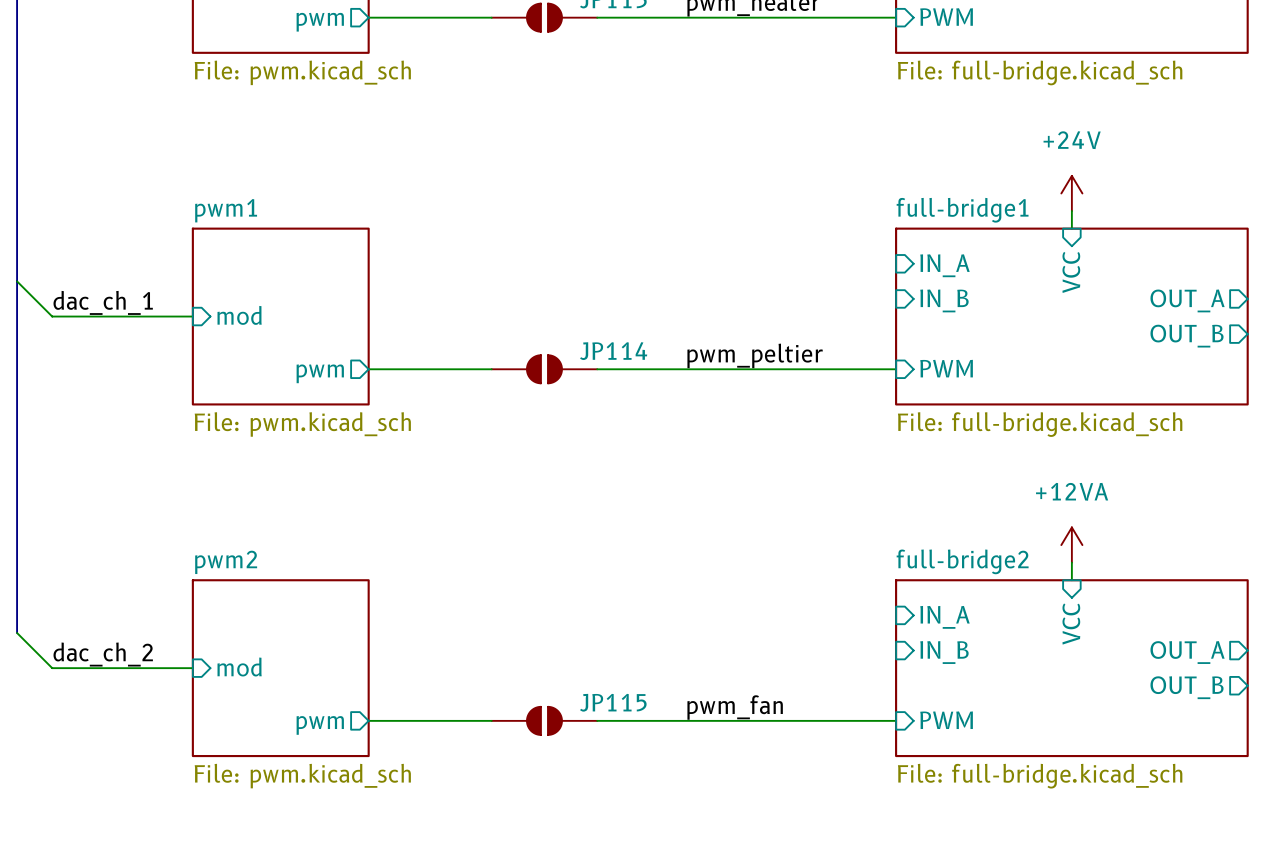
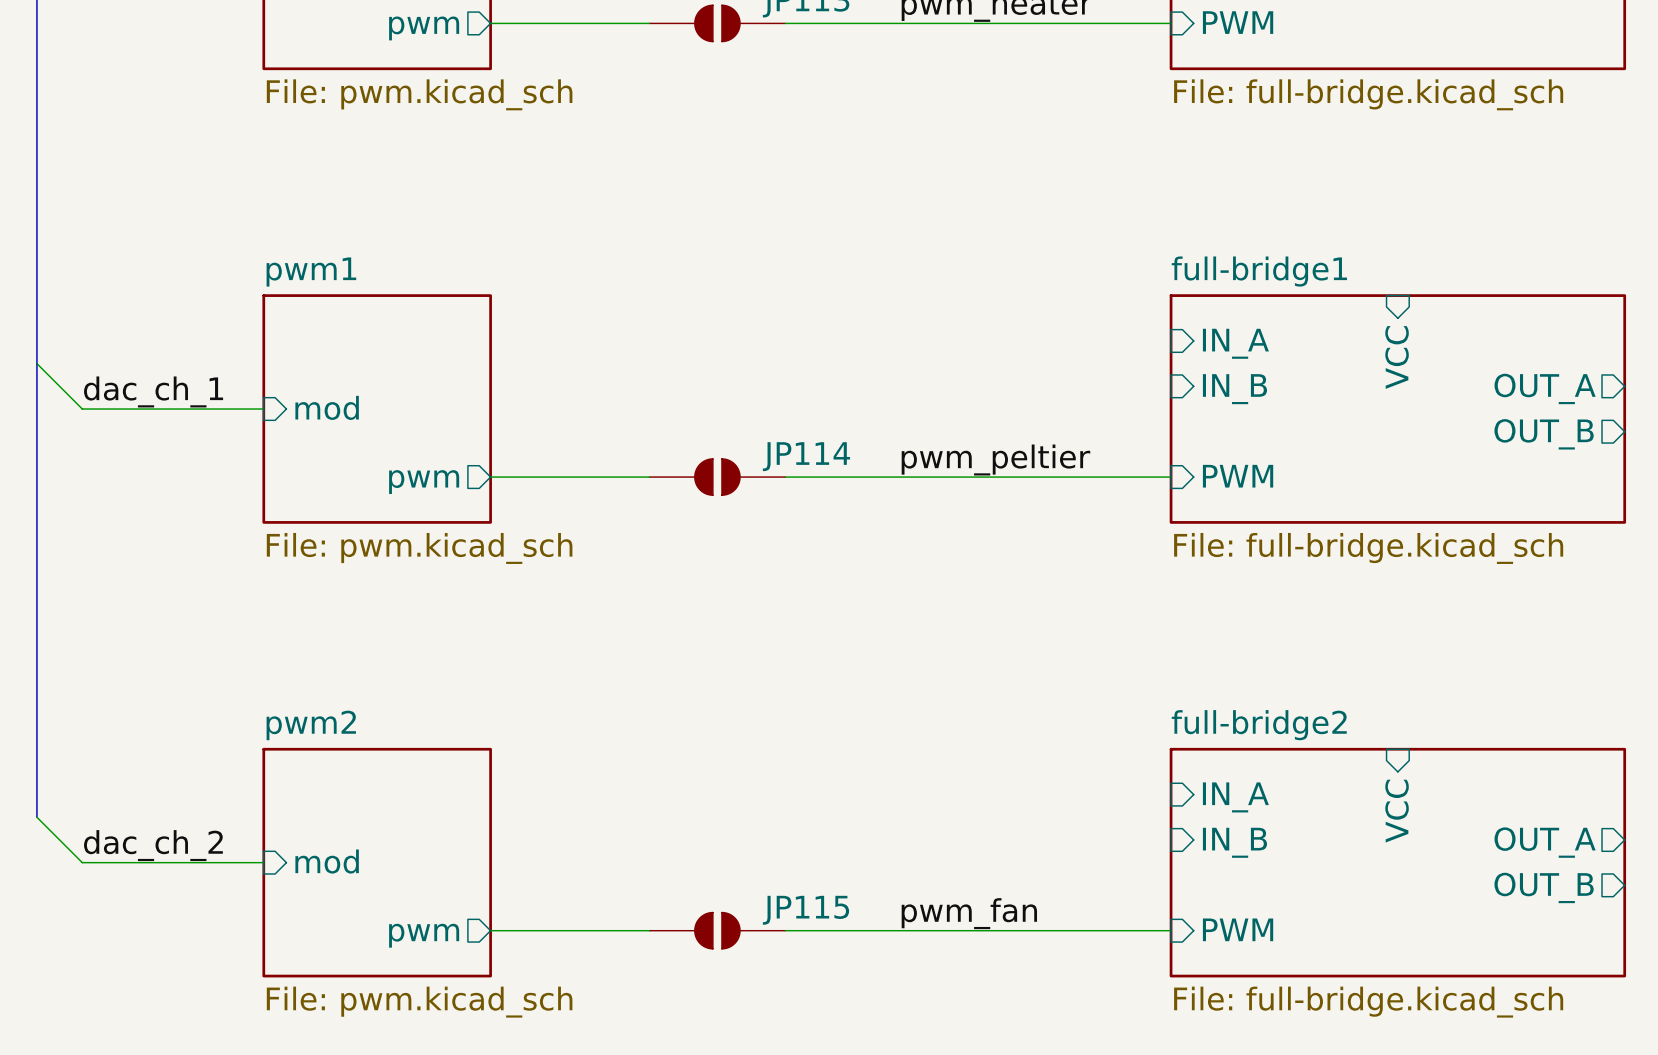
power symbol: +24V (1071, 193) -> none
wire: (1071, 211) (1071, 228) -> none
power symbol: +12VA (1071, 545) -> none
wire: (1071, 562) (1071, 580) -> none

